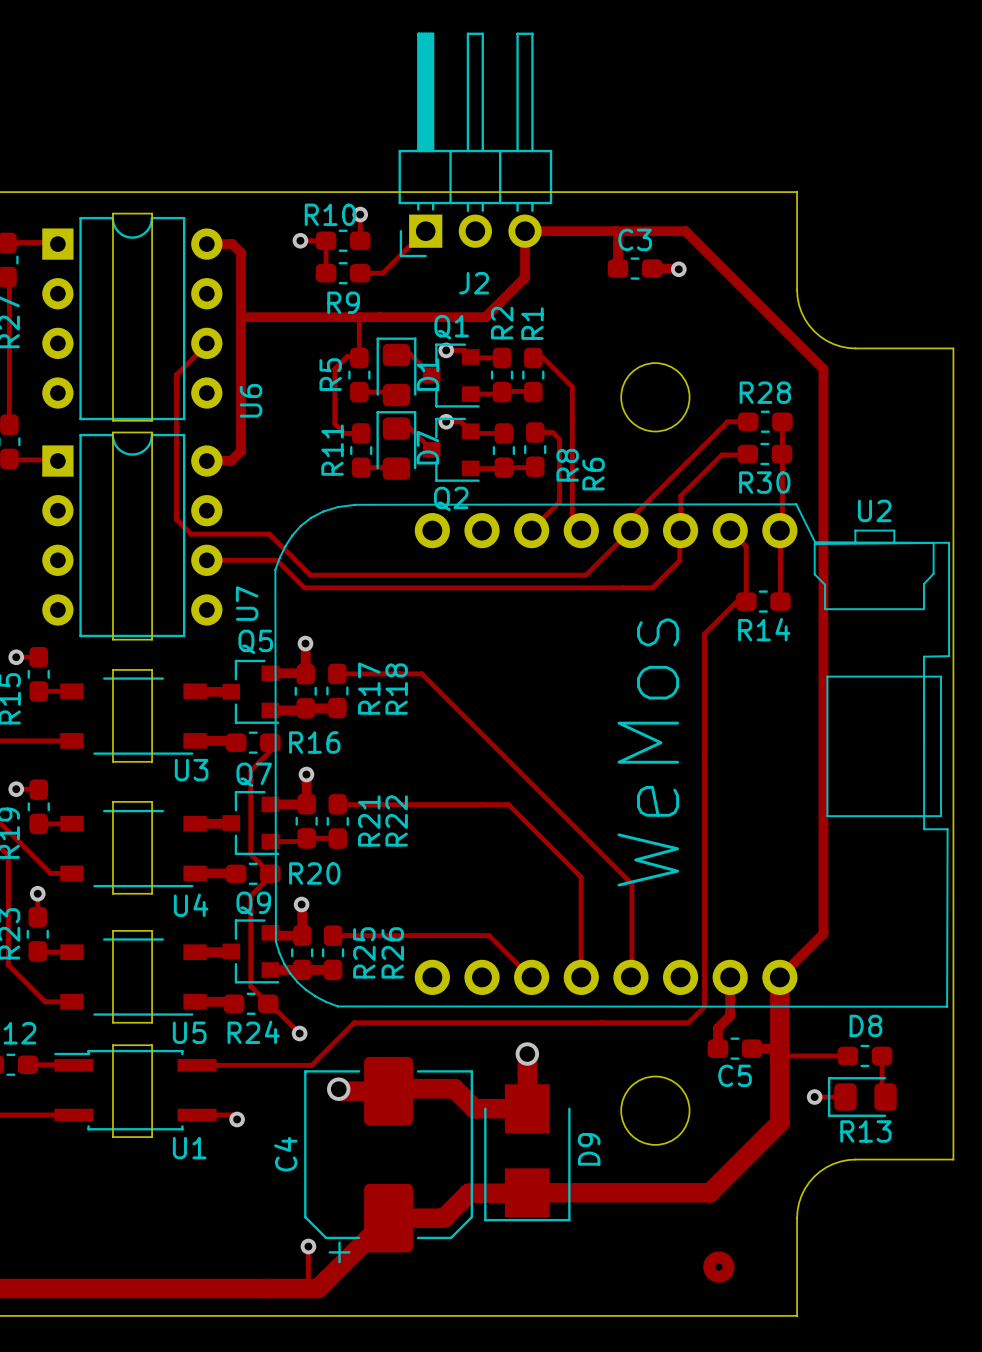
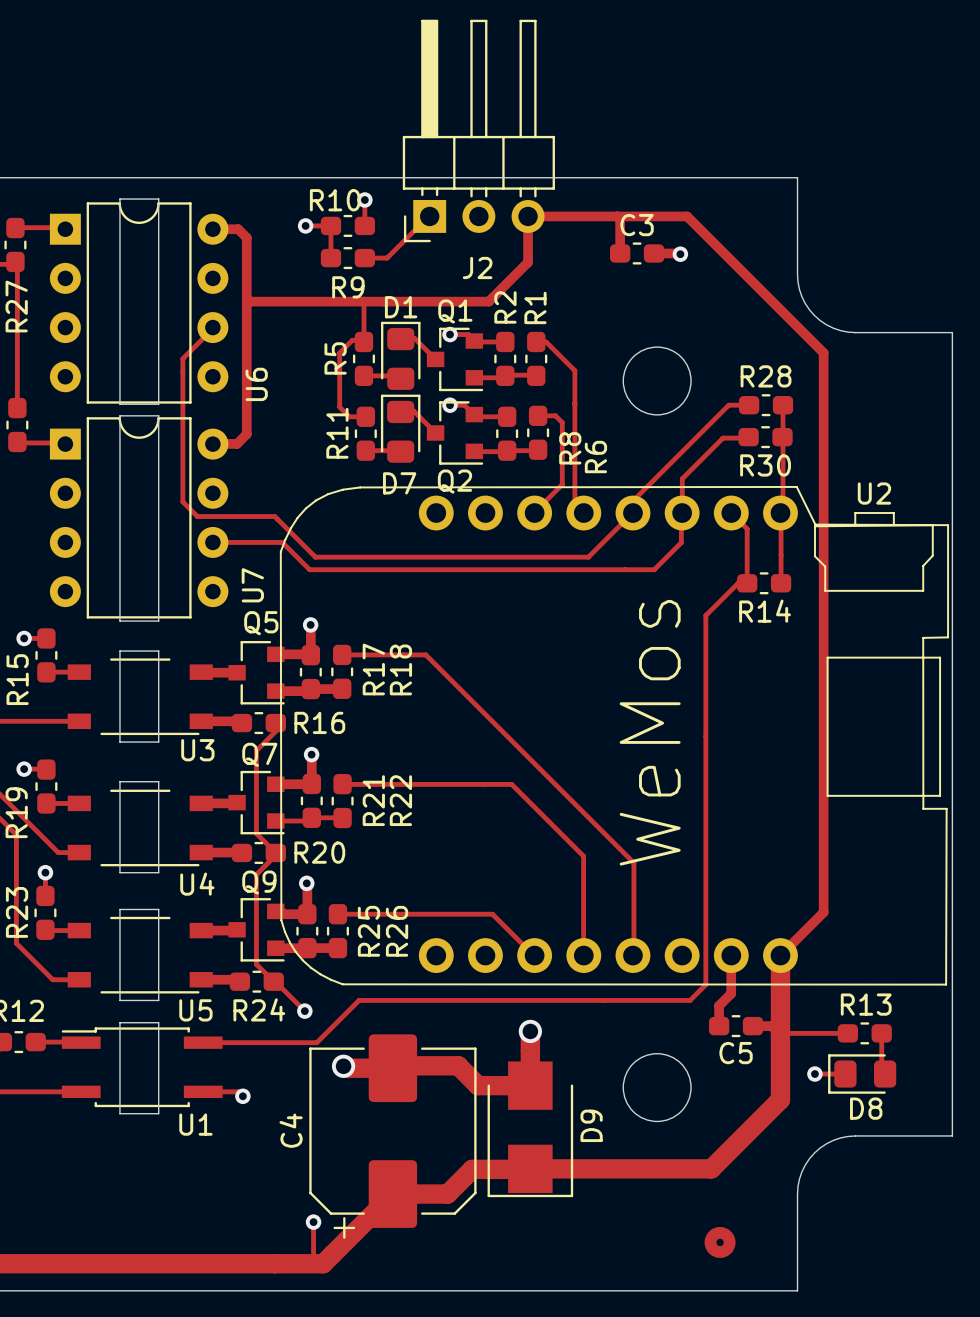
D1 name rotation: 0° (428, 374) -> 90° clockwise (401, 307)
D1 name position: D1 (428, 374) -> D1 (401, 307)
D7 name rotation: 0° (427, 447) -> 90° clockwise (399, 483)
D7 name position: D7 (427, 447) -> D7 (399, 483)
D8 name position: D8 (865, 1025) -> D8 (866, 1108)
R13 name position: R13 (865, 1131) -> R13 (866, 1004)

